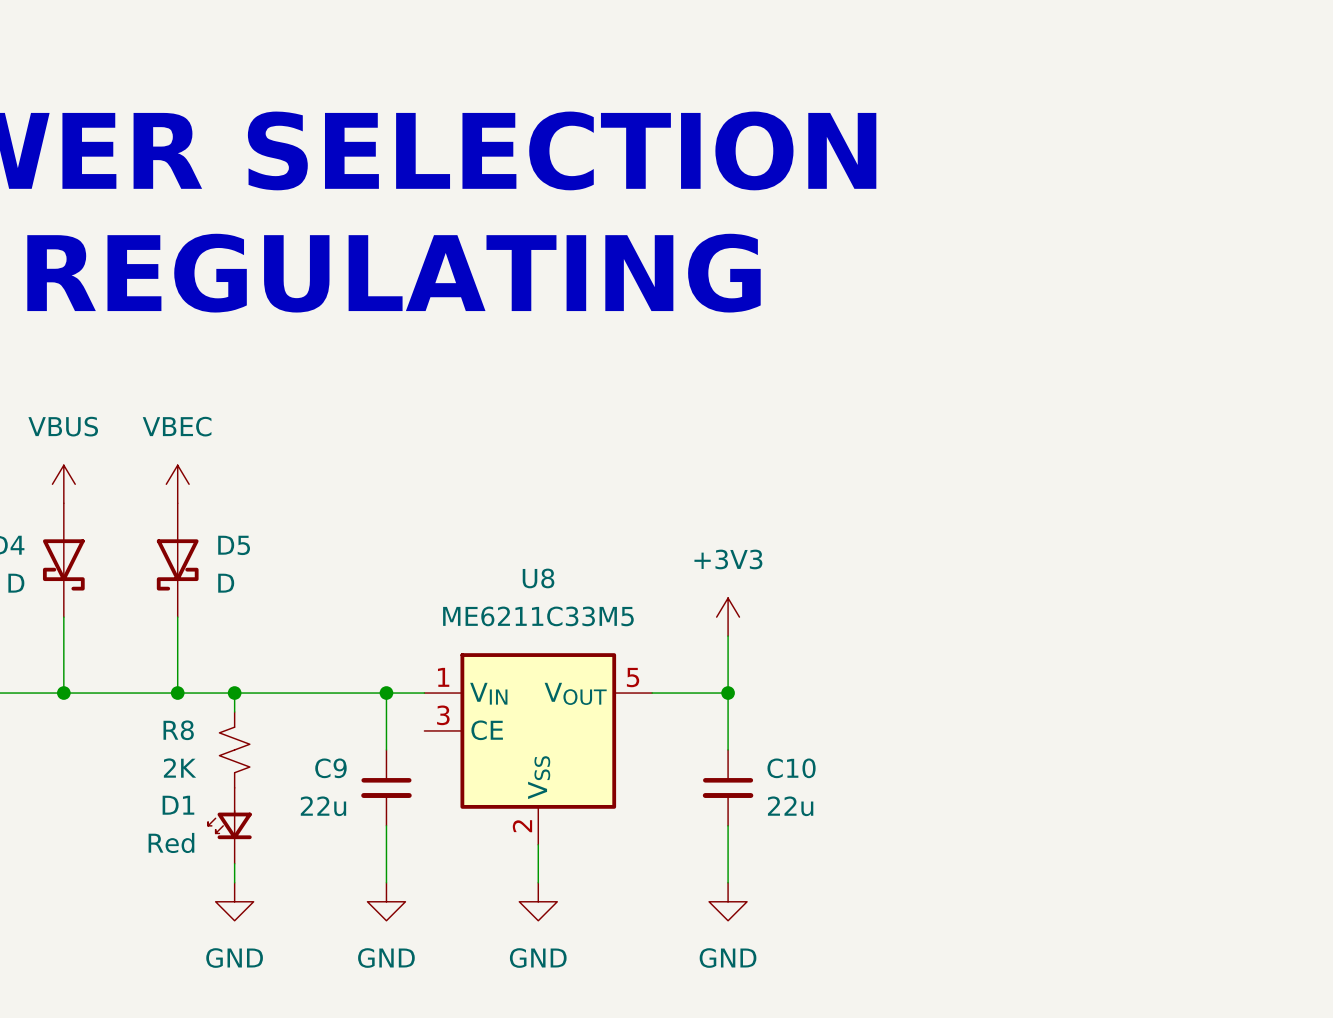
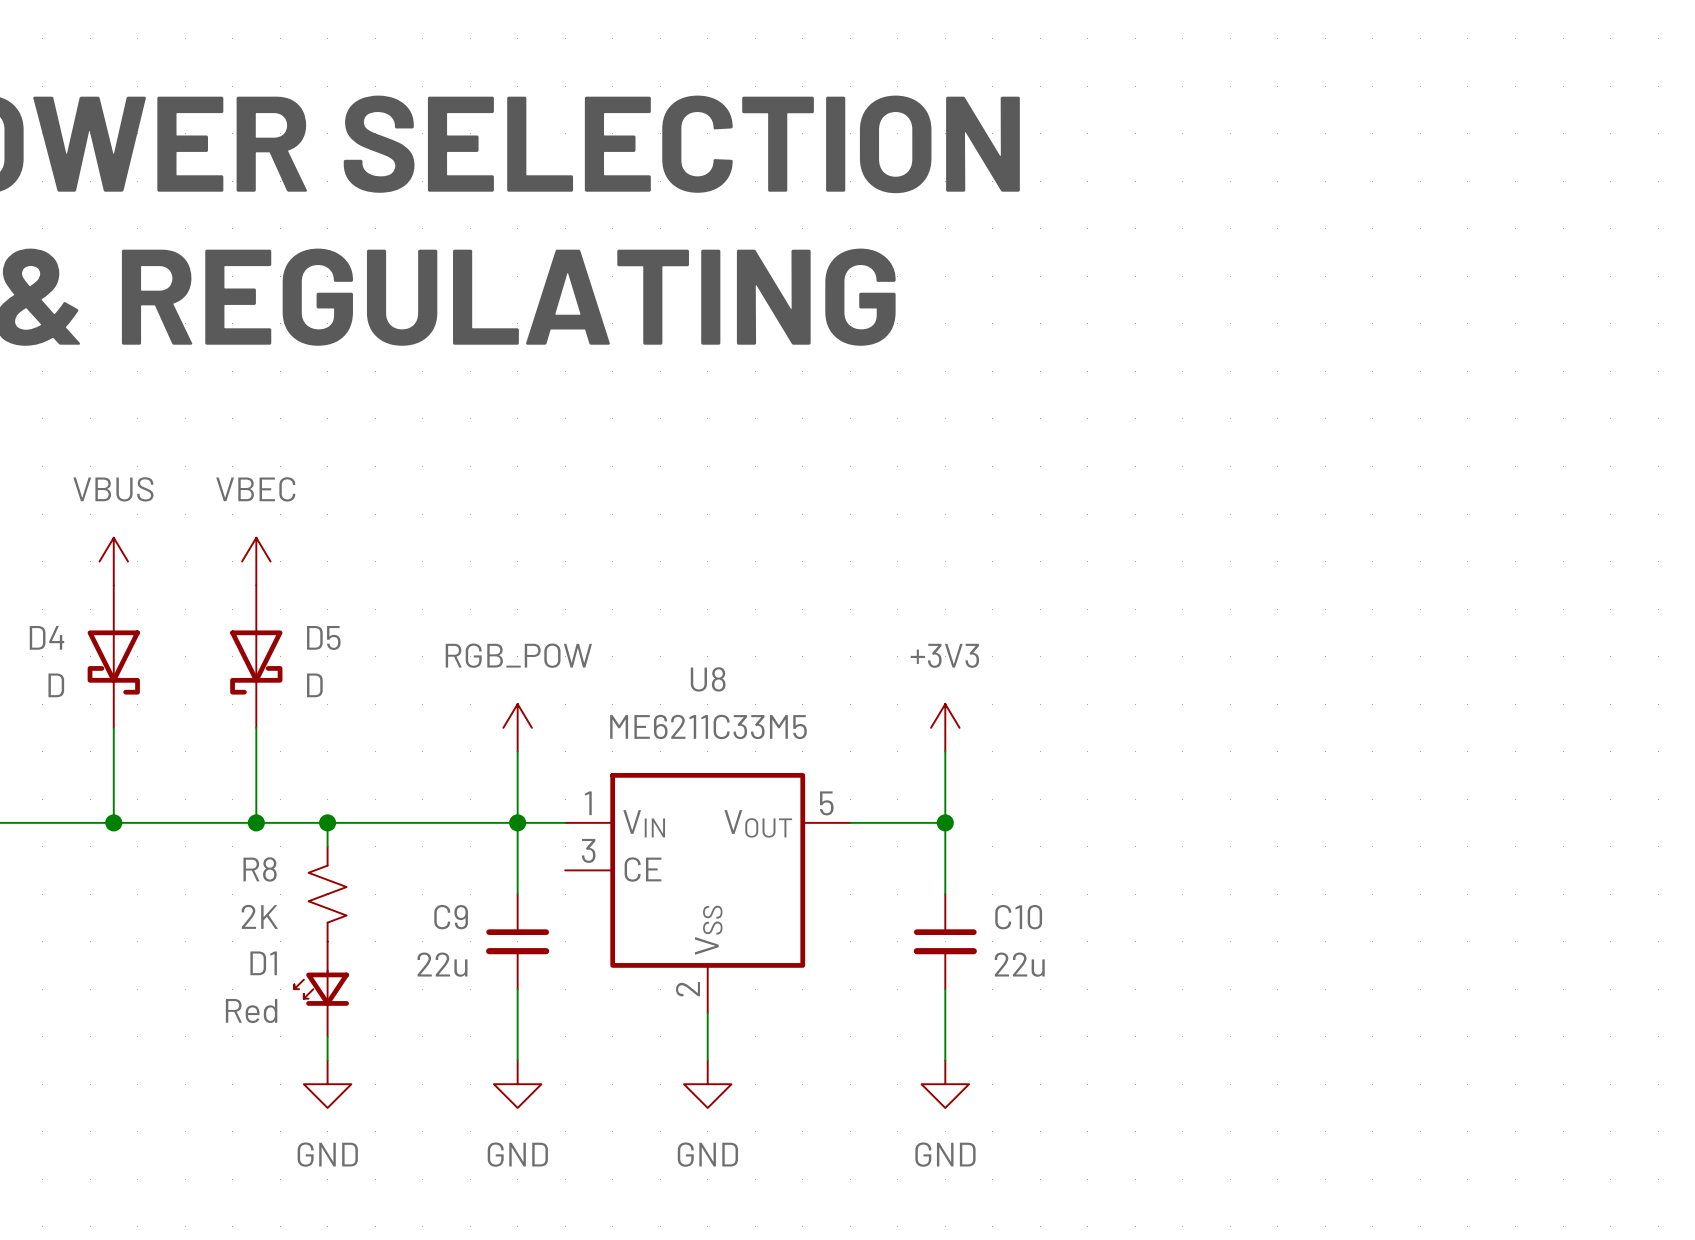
power symbol: none -> RGB_POW (517, 727)
wire: none -> (517, 751) (517, 822)

